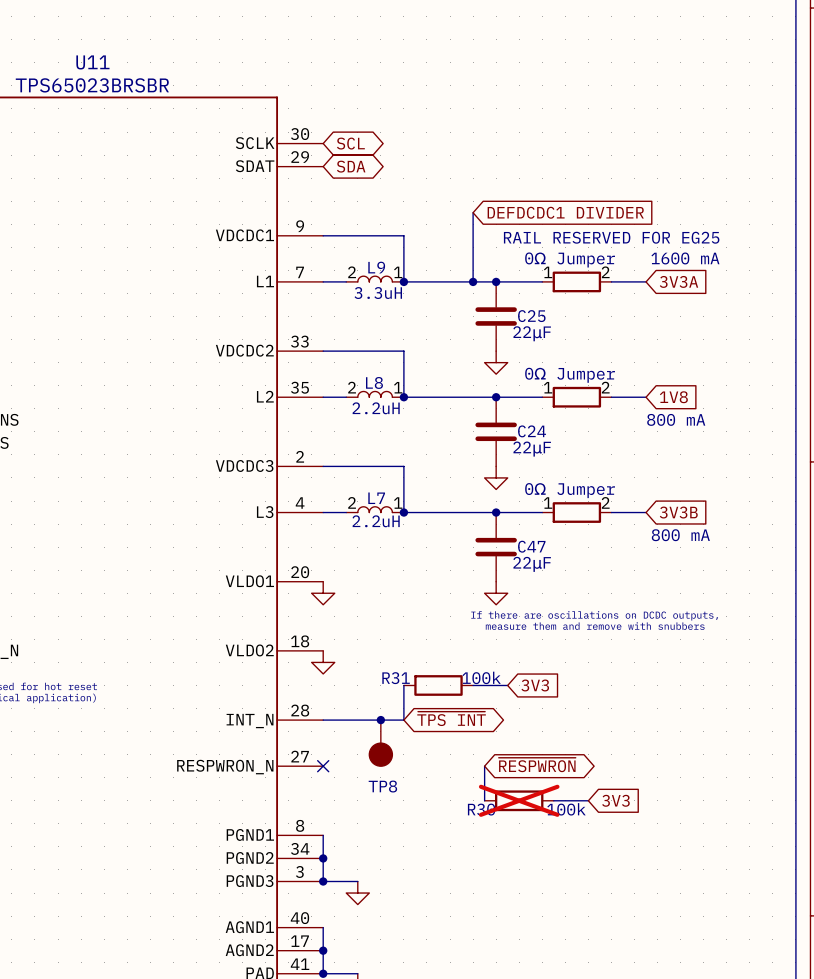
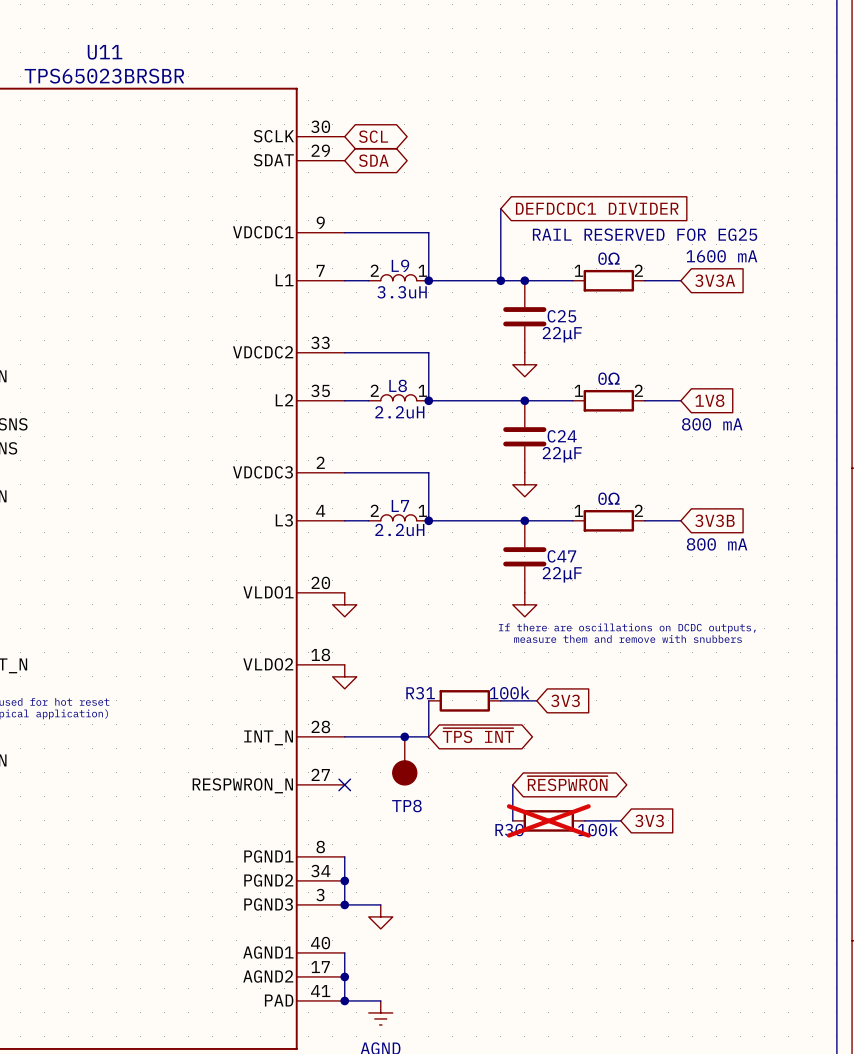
part value: 0Ω Jumper (570, 259) -> 0Ω (609, 258)
part value: 0Ω Jumper (570, 375) -> 0Ω (609, 378)
part value: 0Ω Jumper (570, 490) -> 0Ω (609, 498)

